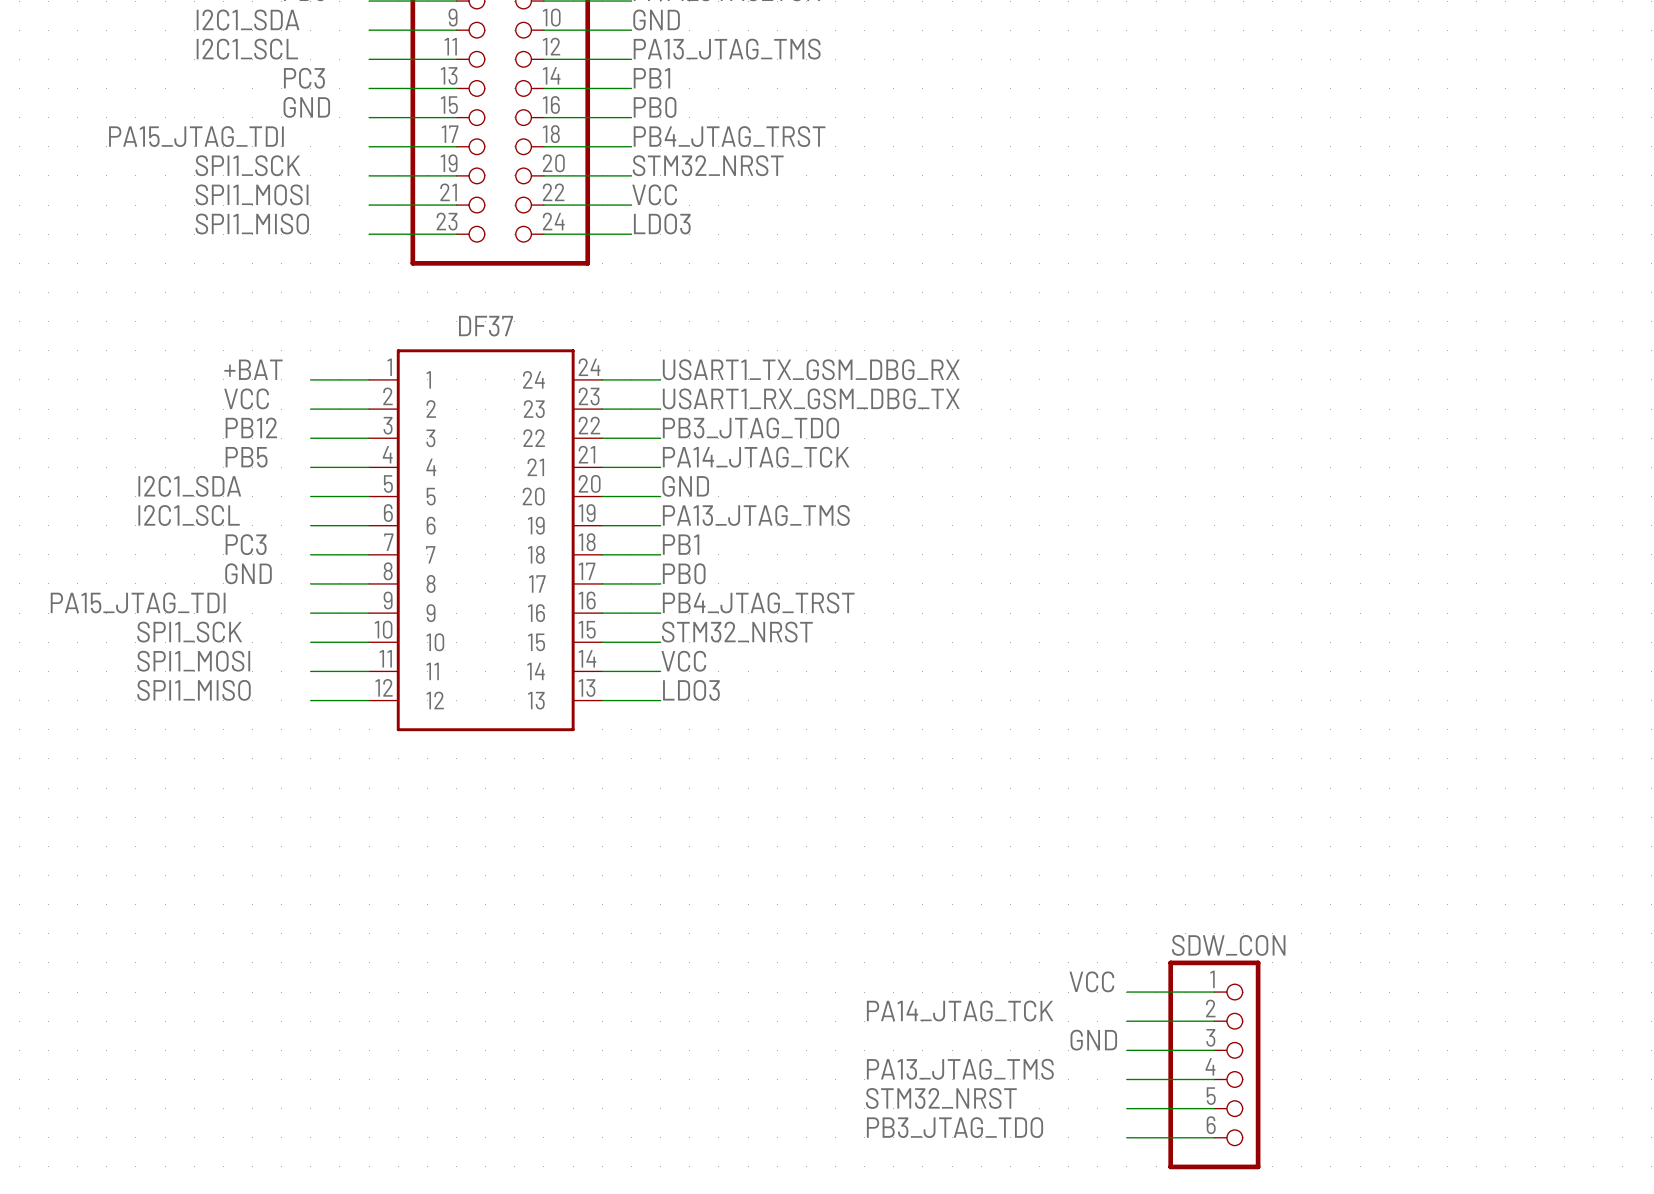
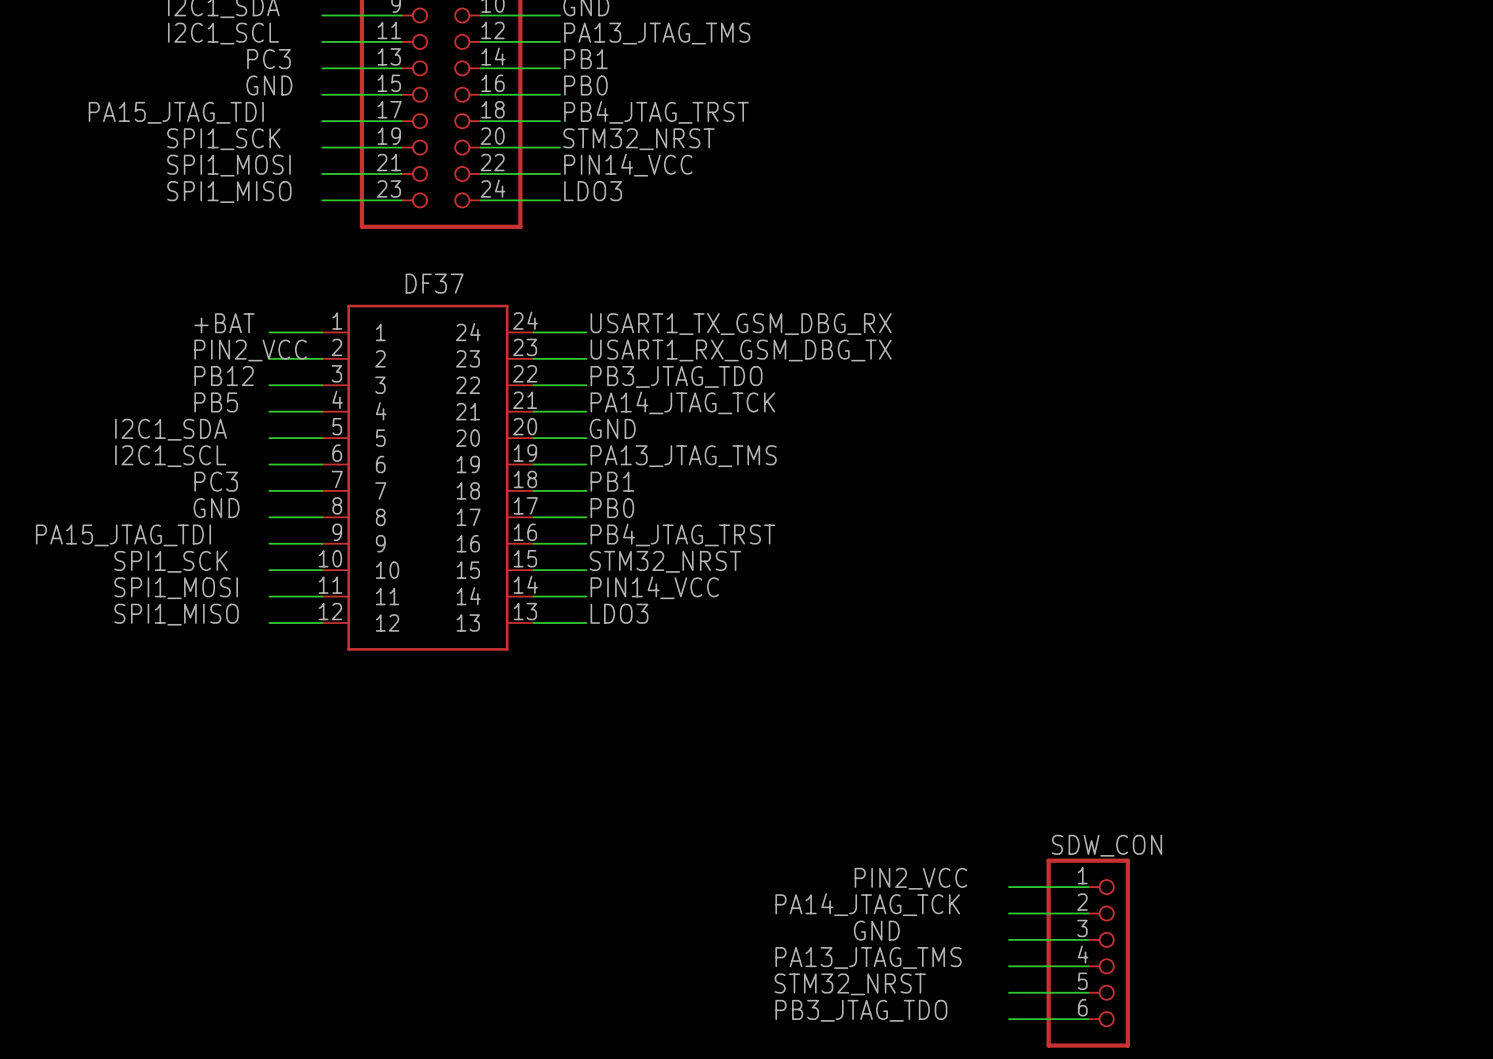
label: VCC (654, 194) -> PIN14_VCC (628, 165)
label: VCC (246, 398) -> PIN2_VCC (250, 350)
label: VCC (683, 661) -> PIN14_VCC (654, 587)
label: none -> PIN2_VCC (910, 878)
label: VCC (1091, 981) -> none
label position: GND (1093, 1040) -> GND (876, 930)

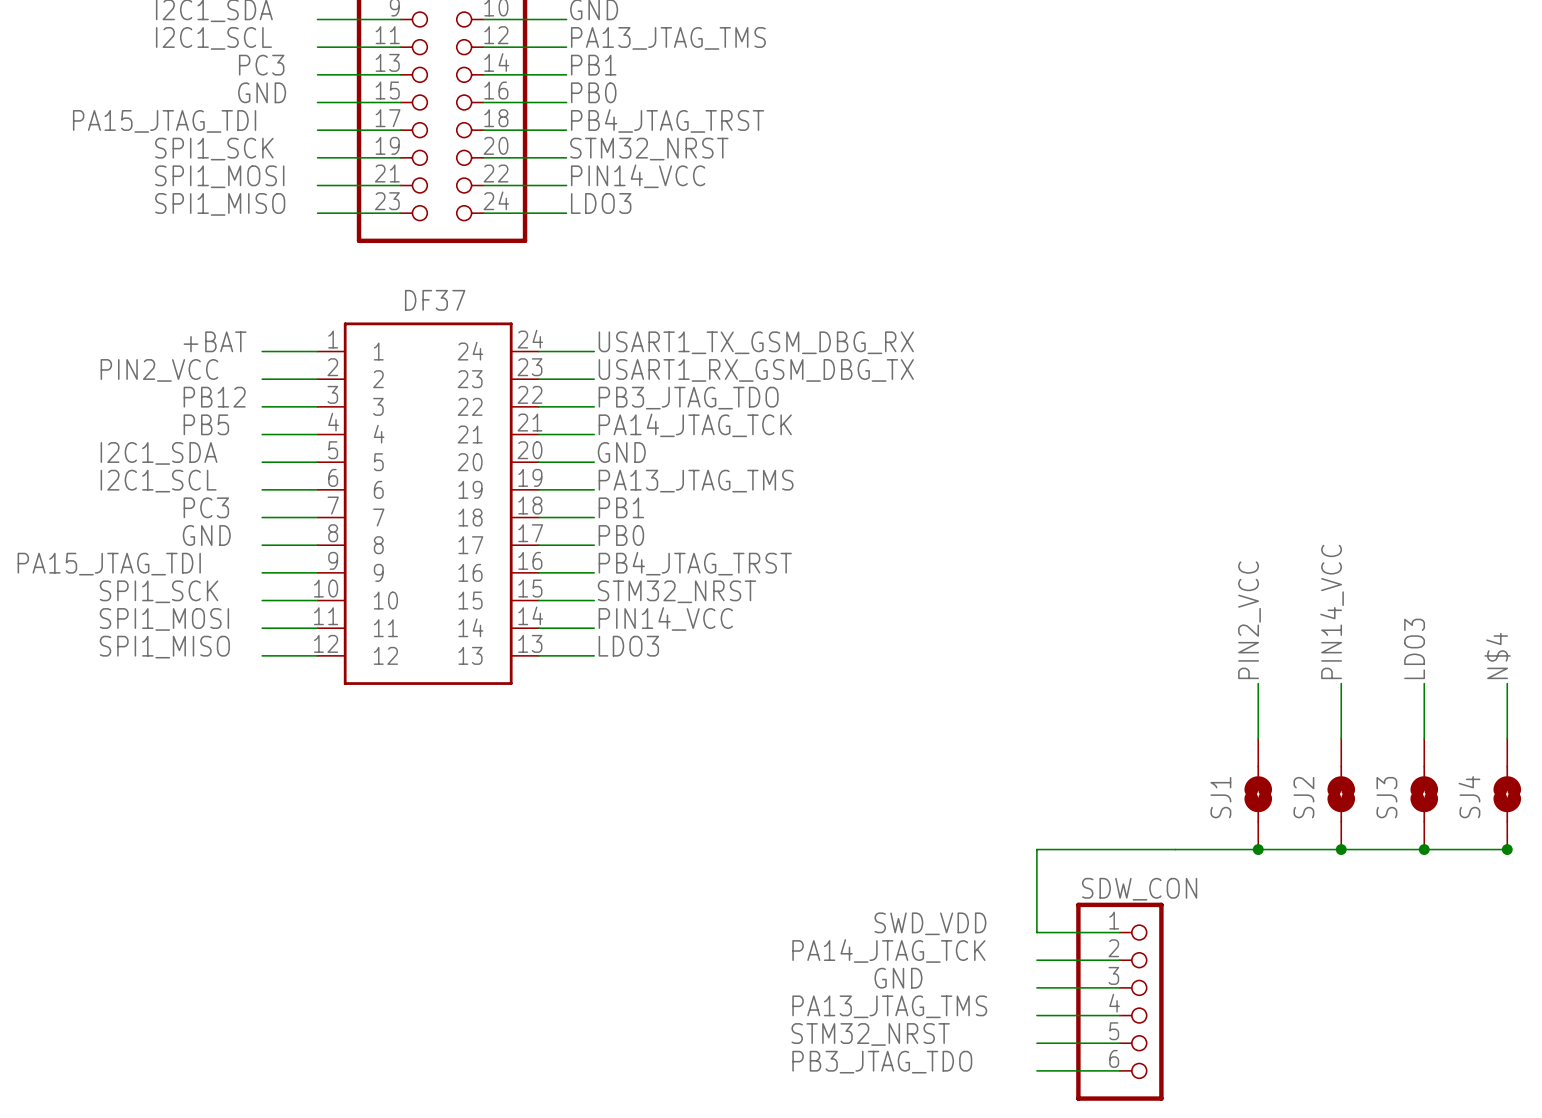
label position: PIN2_VCC (250, 350) -> PIN2_VCC (159, 370)
label: none -> PIN14_VCC (1332, 611)
label: none -> PIN2_VCC (1249, 620)
label: none -> LDO3 (1414, 648)
label: none -> N$4 (1497, 655)
wire: none -> (1258, 683) (1258, 738)
wire: none -> (1341, 683) (1341, 738)
wire: none -> (1424, 683) (1424, 738)
wire: none -> (1507, 683) (1507, 738)
SJ1: none -> (1258, 794)
SJ2: none -> (1341, 794)
SJ3: none -> (1424, 794)
SJ4: none -> (1507, 794)
junction: none -> (1258, 849)
junction: none -> (1341, 849)
junction: none -> (1424, 849)
wire: none -> (1507, 849) (1036, 849) (1036, 932)
junction: none -> (1507, 849)
label: PIN2_VCC (910, 878) -> SWD_VDD (930, 923)

